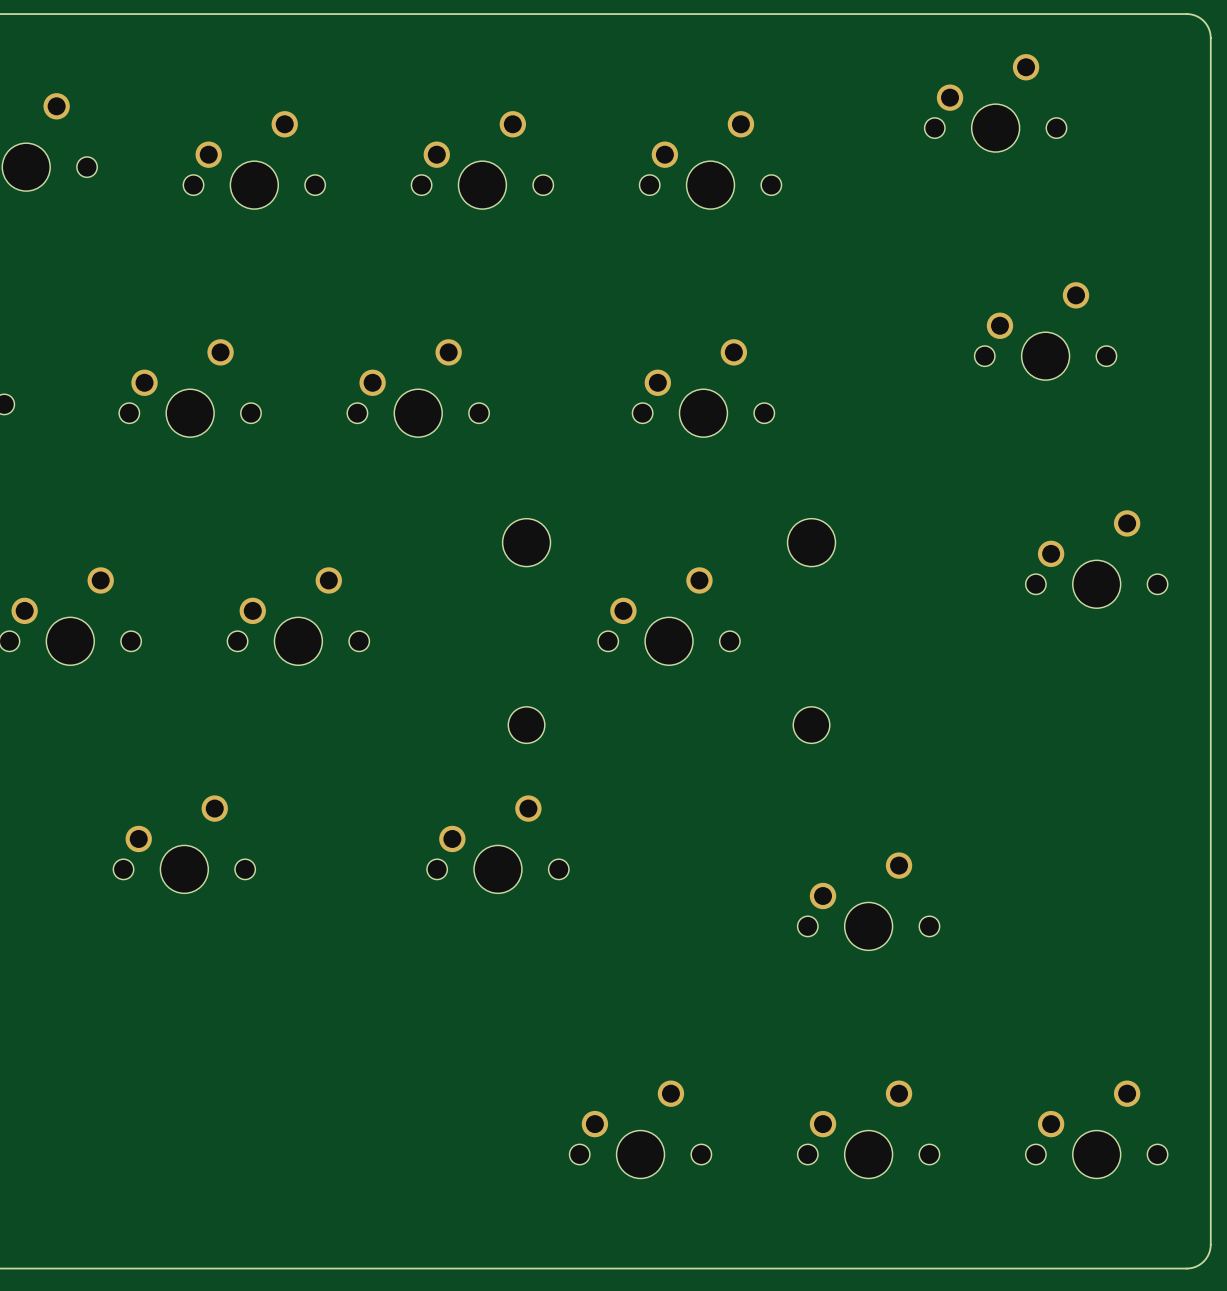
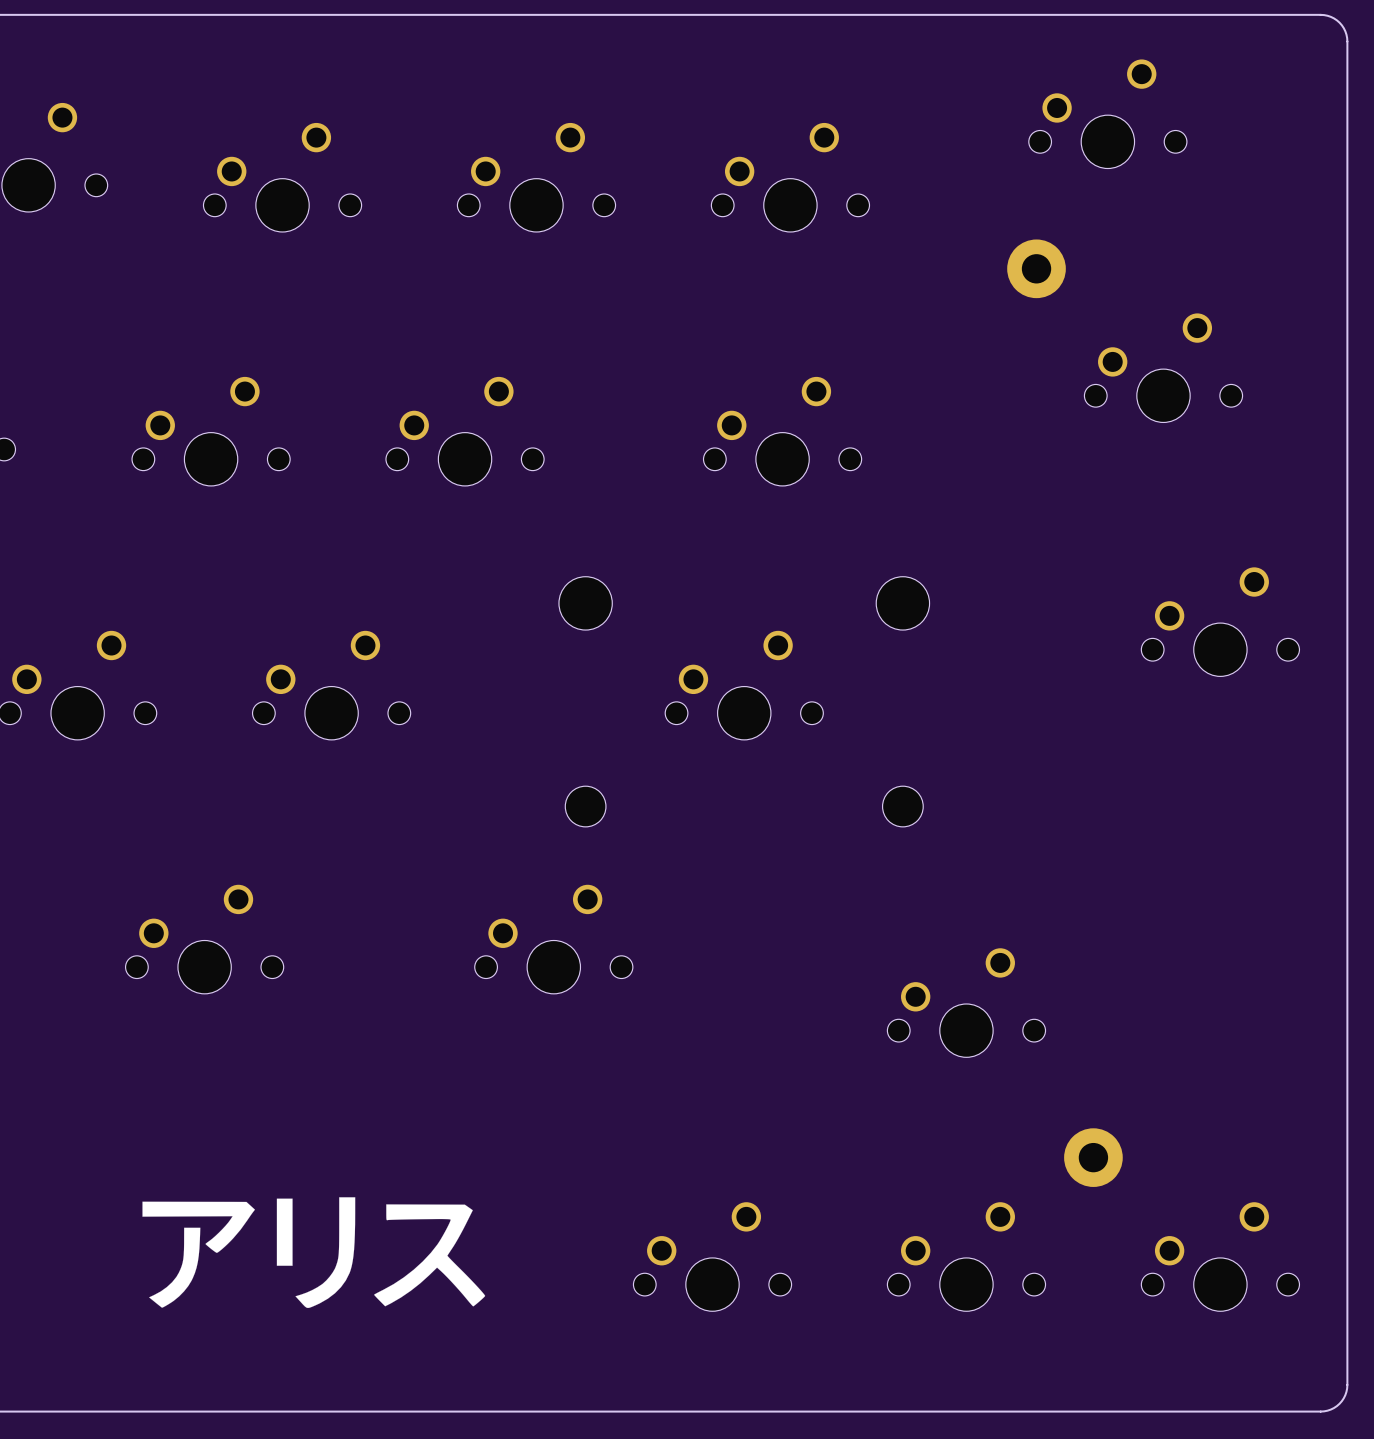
part: none -> (1036, 268)
part: none -> (1093, 1157)
drawing: none -> [142, 1197, 486, 1309]

